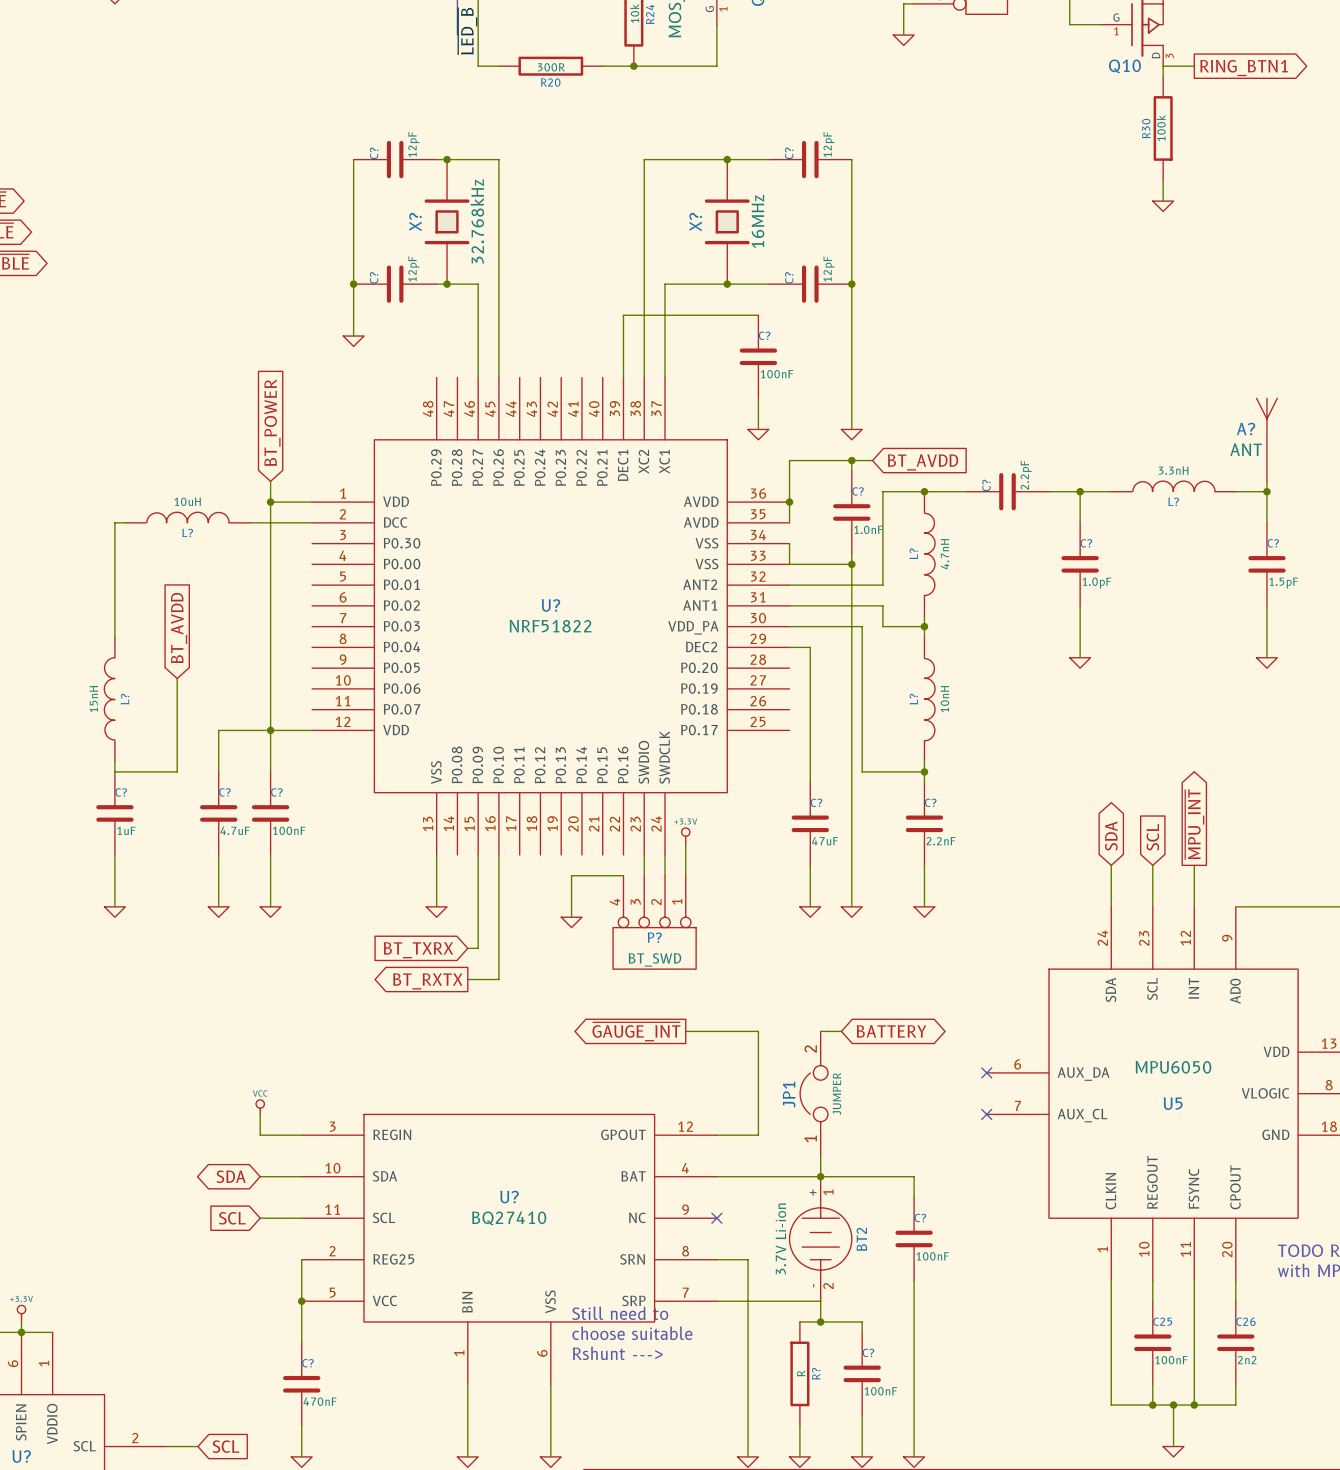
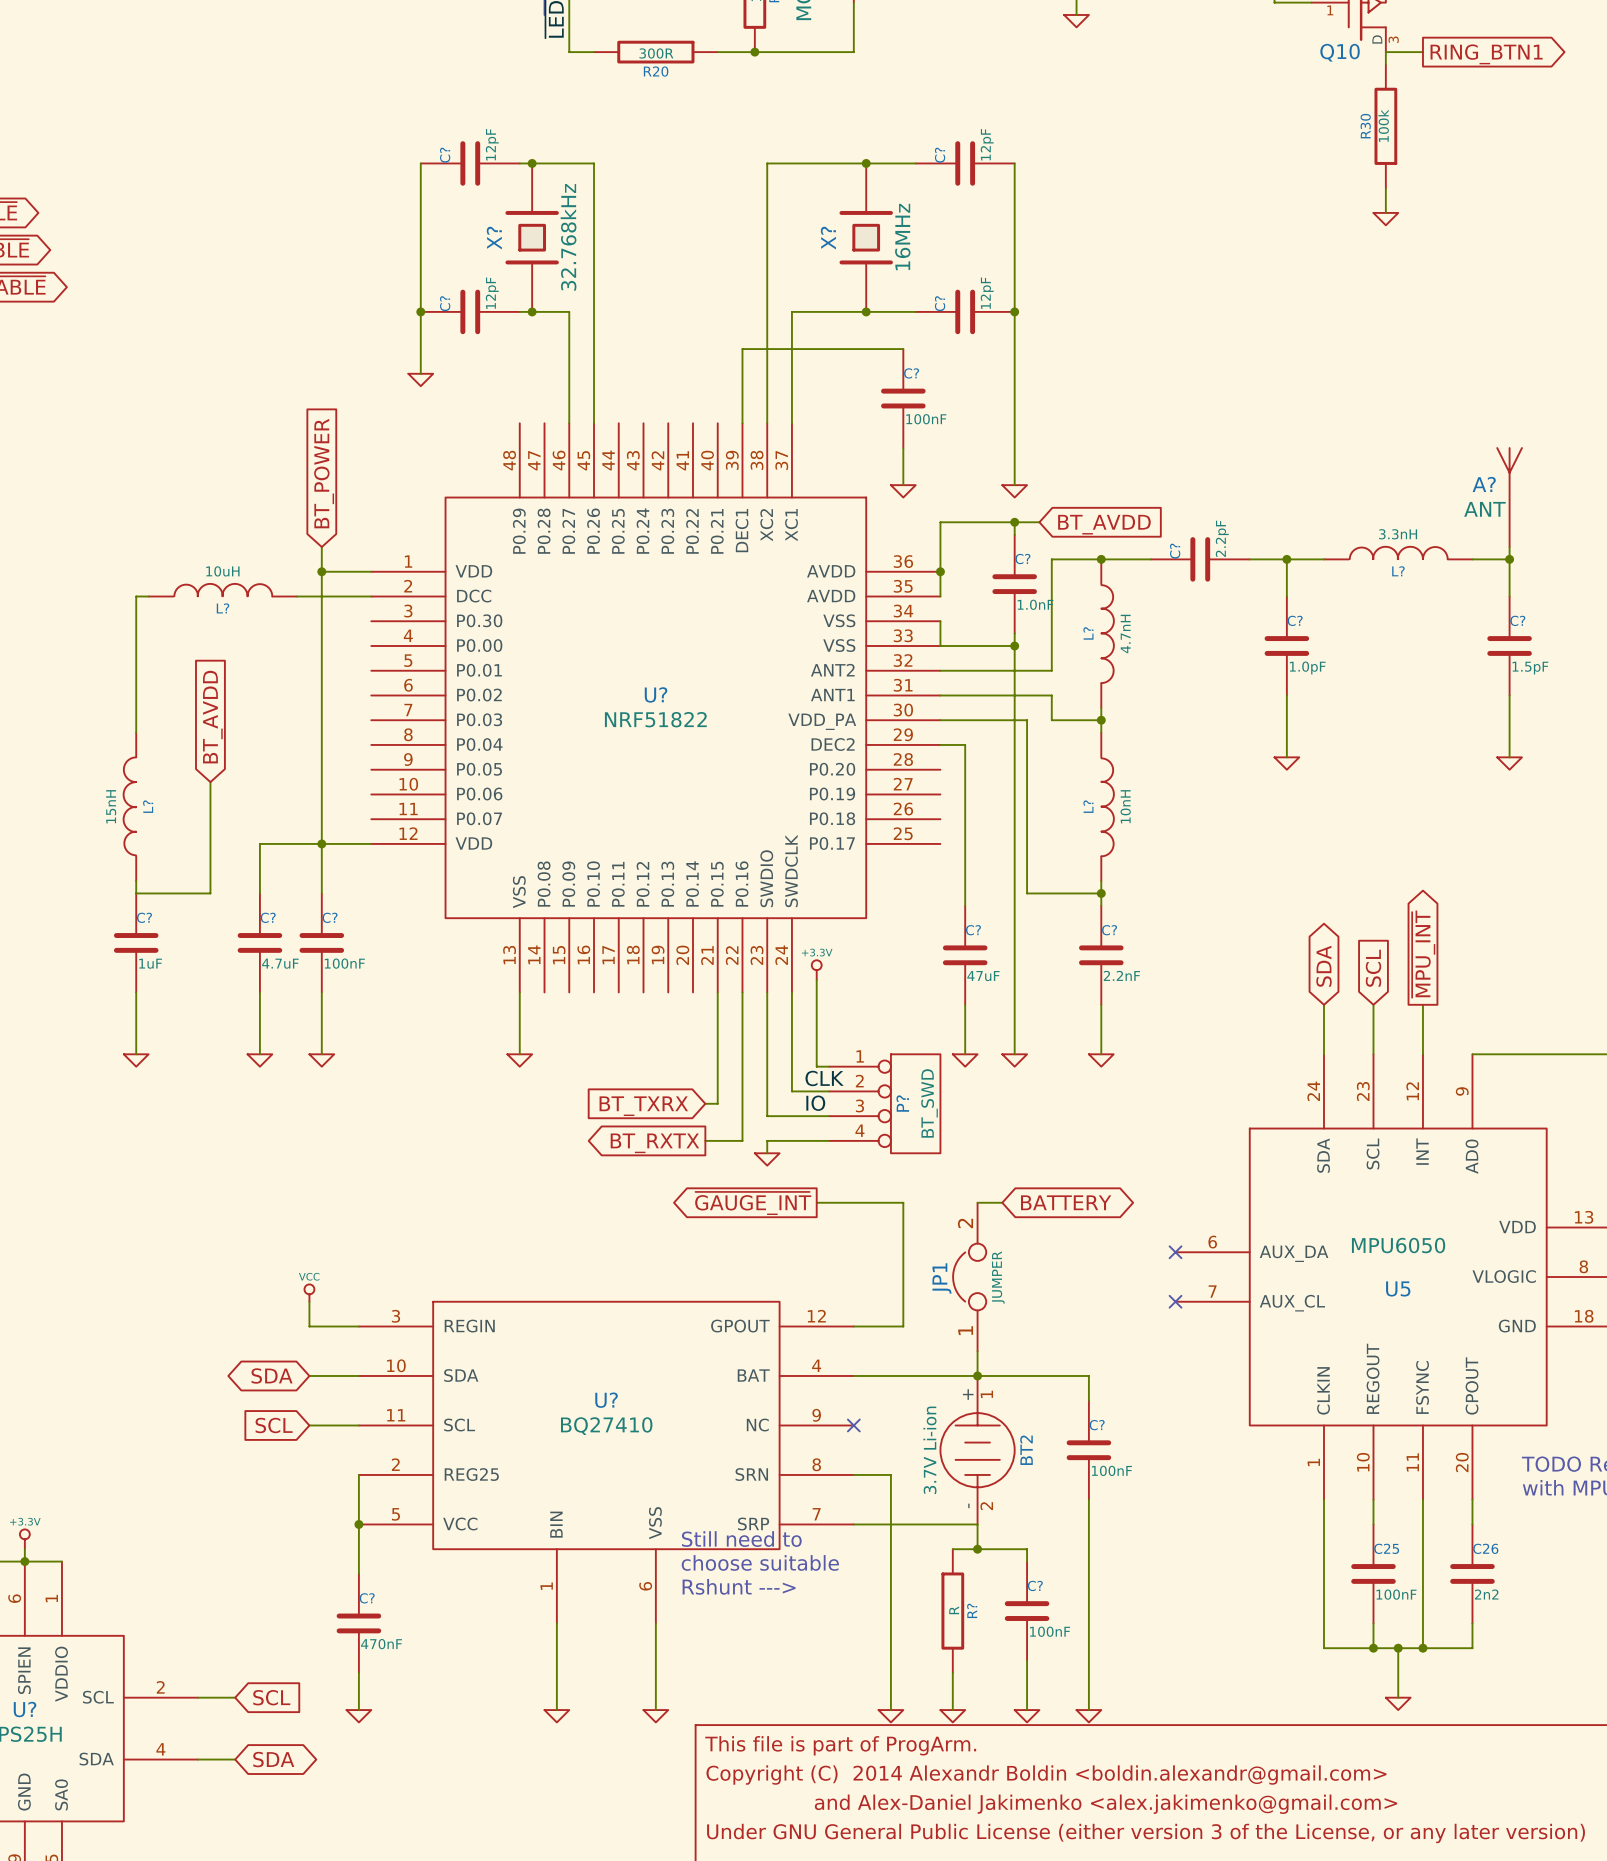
wire: (478, 854) (478, 948) (467, 948) -> (717, 992) (717, 1103) (705, 1103)
wire: (498, 854) (498, 979) (467, 979) -> (742, 992) (742, 1140) (705, 1140)
wire: (623, 875) (571, 875) (571, 917) -> none
wire: none -> (767, 1017) (767, 1116) (829, 1116)
wire: none -> (791, 1017) (791, 1091) (829, 1091)
power symbol position: (571, 922) -> (767, 1159)
P? position: (654, 922) -> (884, 1103)
label: none -> CLK (824, 1078)
label: none -> IO (815, 1103)
P? rotation: 0° (654, 948) -> 90° counterclockwise (915, 1103)
global label position: BT_TXRX (418, 950) -> BT_TXRX (643, 1106)
wire: none -> (829, 1140) (767, 1140) (767, 1153)
global label position: BT_RXTX (427, 981) -> BT_RXTX (654, 1143)

